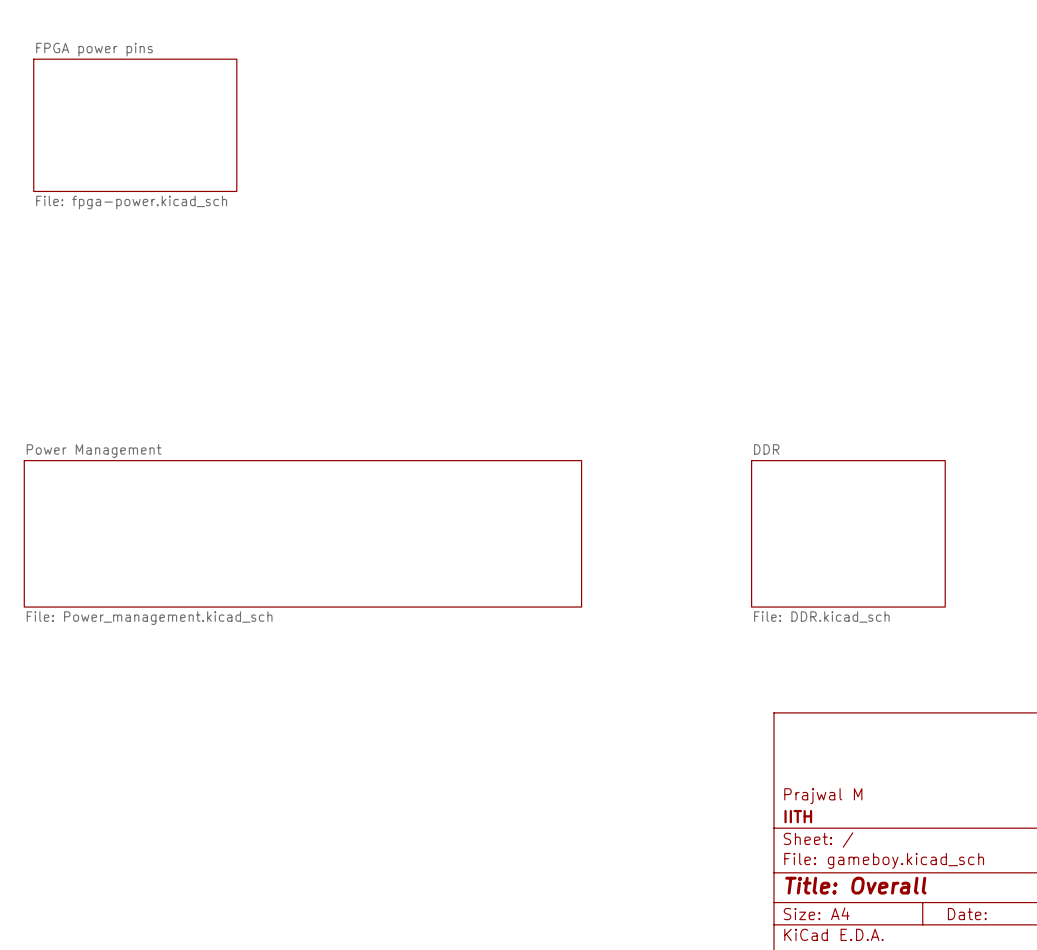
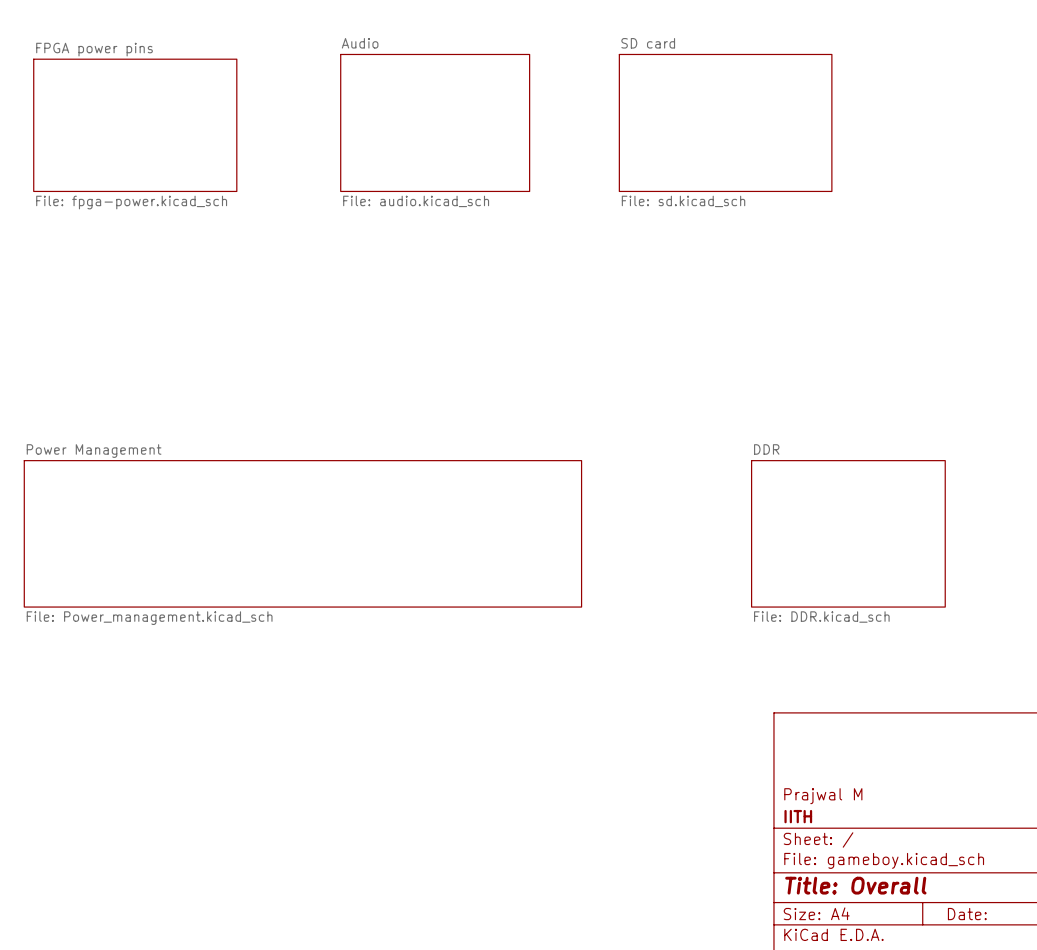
sheet Audio: none -> File: audio.kicad_sch (435, 122)
sheet SD card: none -> File: sd.kicad_sch (725, 122)

